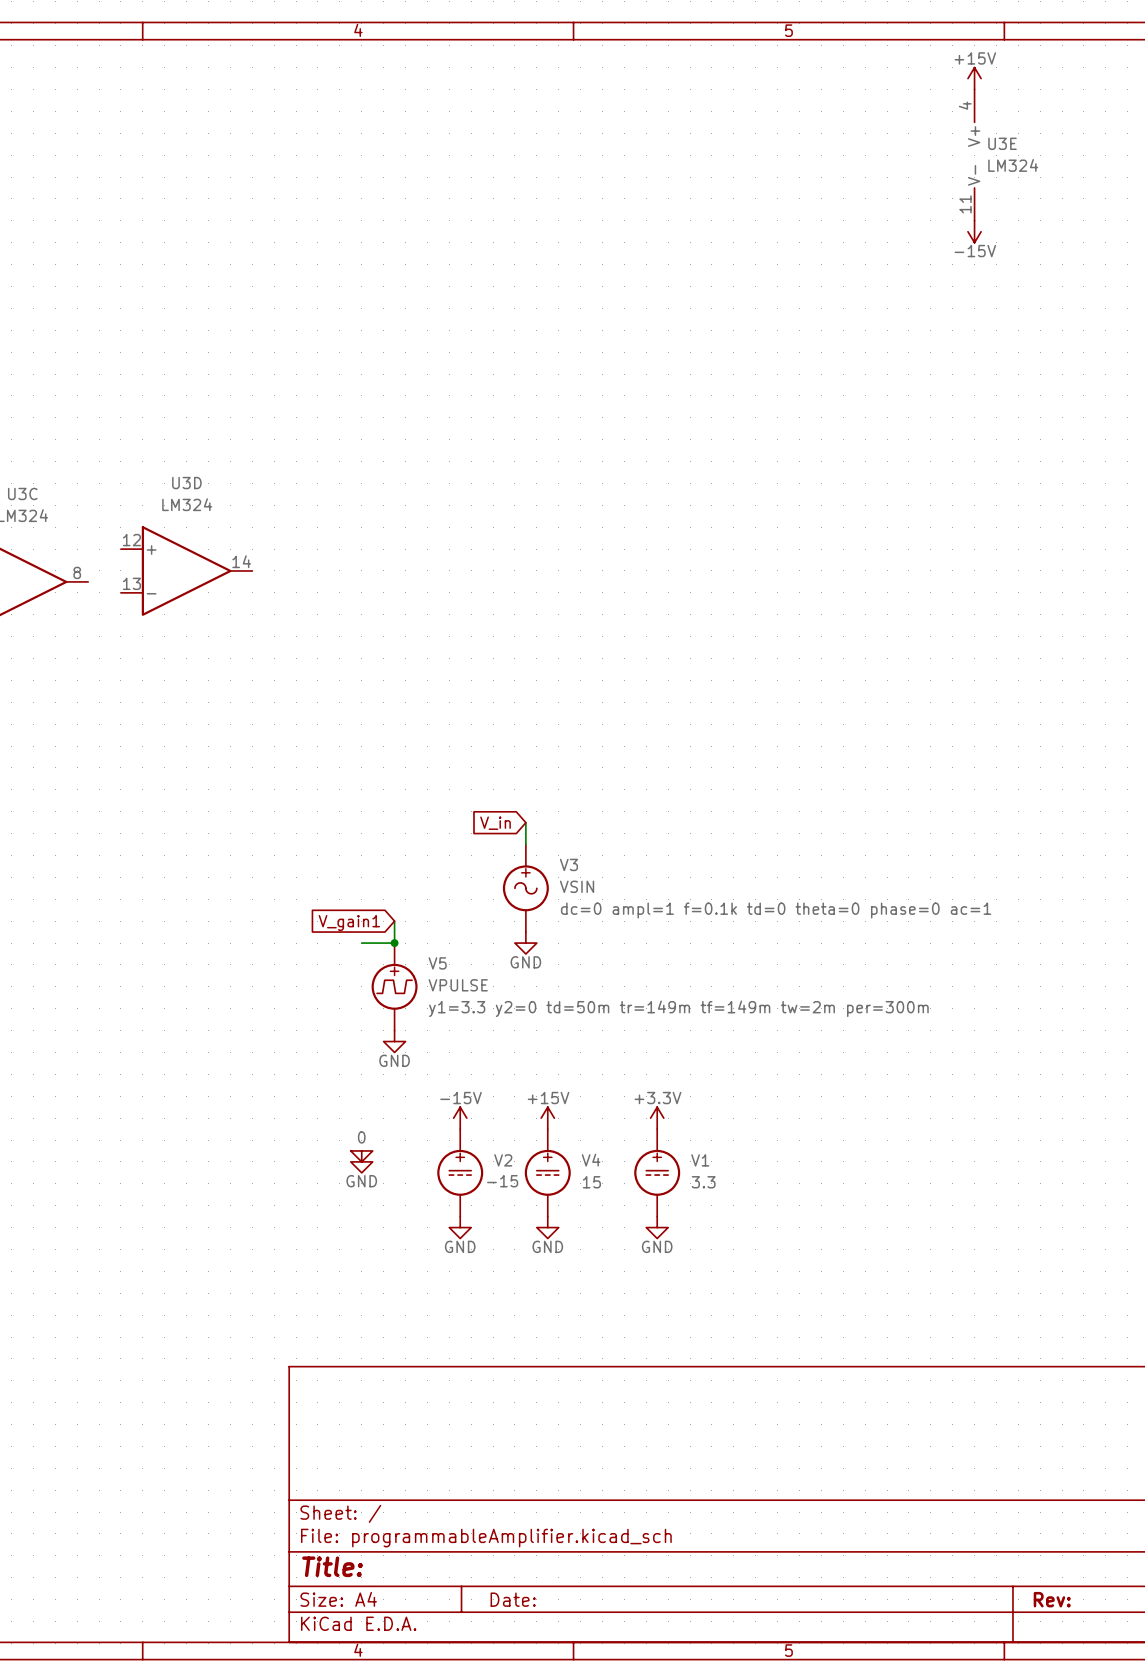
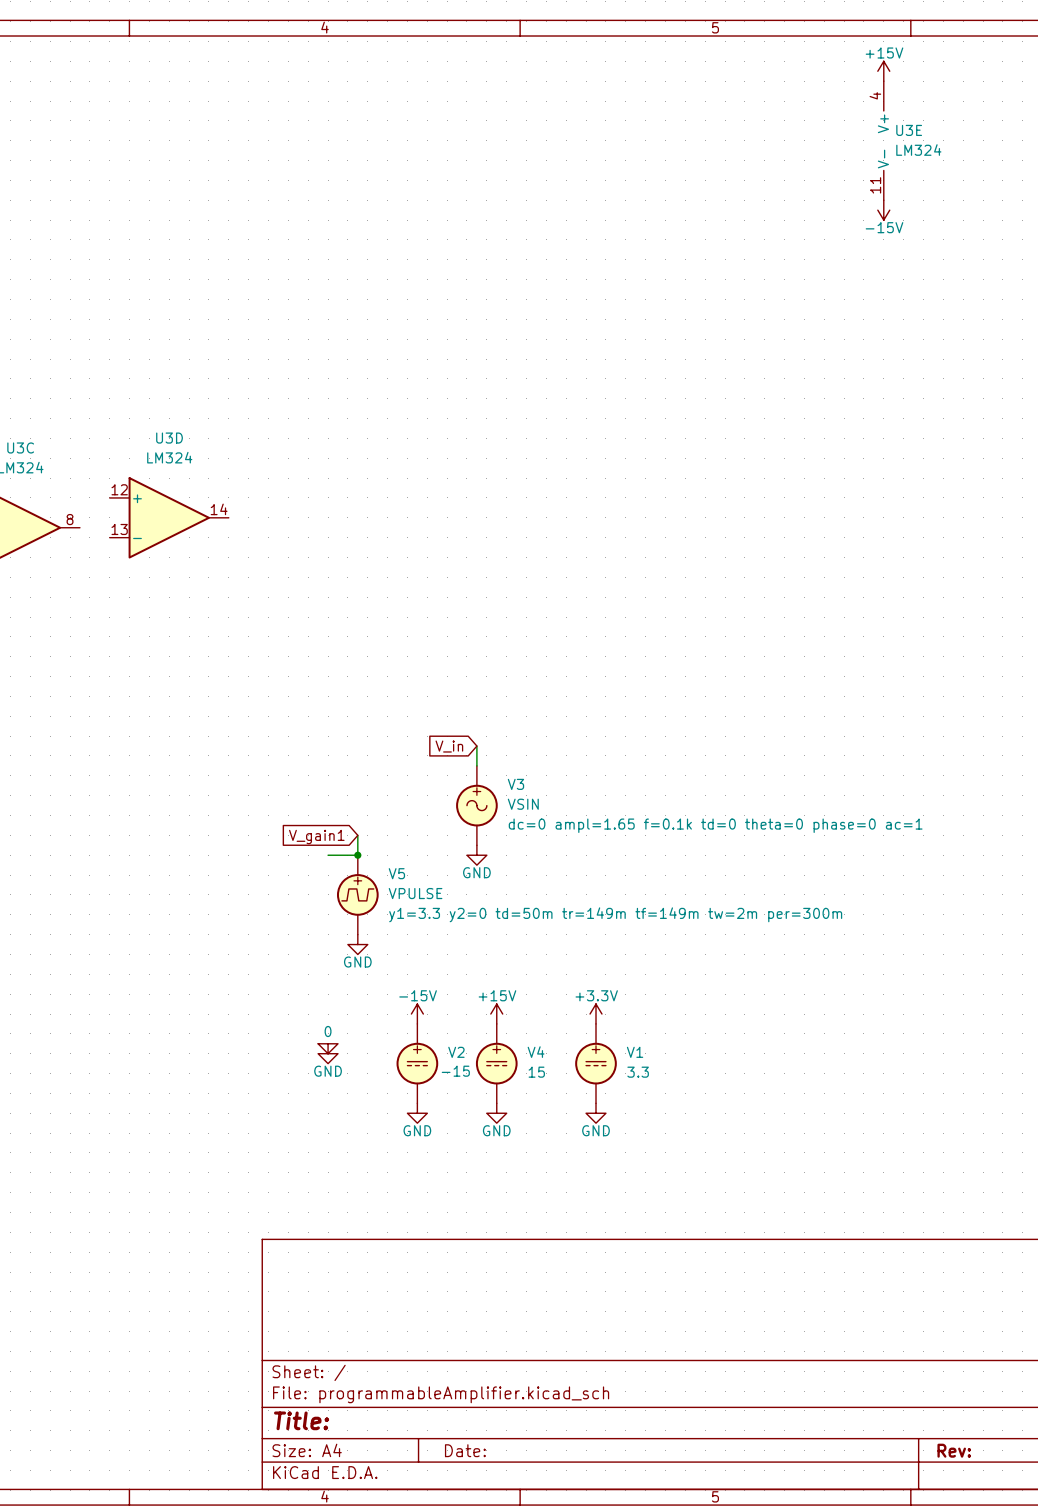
V3 text: dc=0 ampl=1 f=0.1k td=0 theta=0 phase=0 ac=1 (776, 910) -> dc=0 ampl=1.65 f=0.1k td=0 theta=0 phase=0 ac=1 (715, 825)

